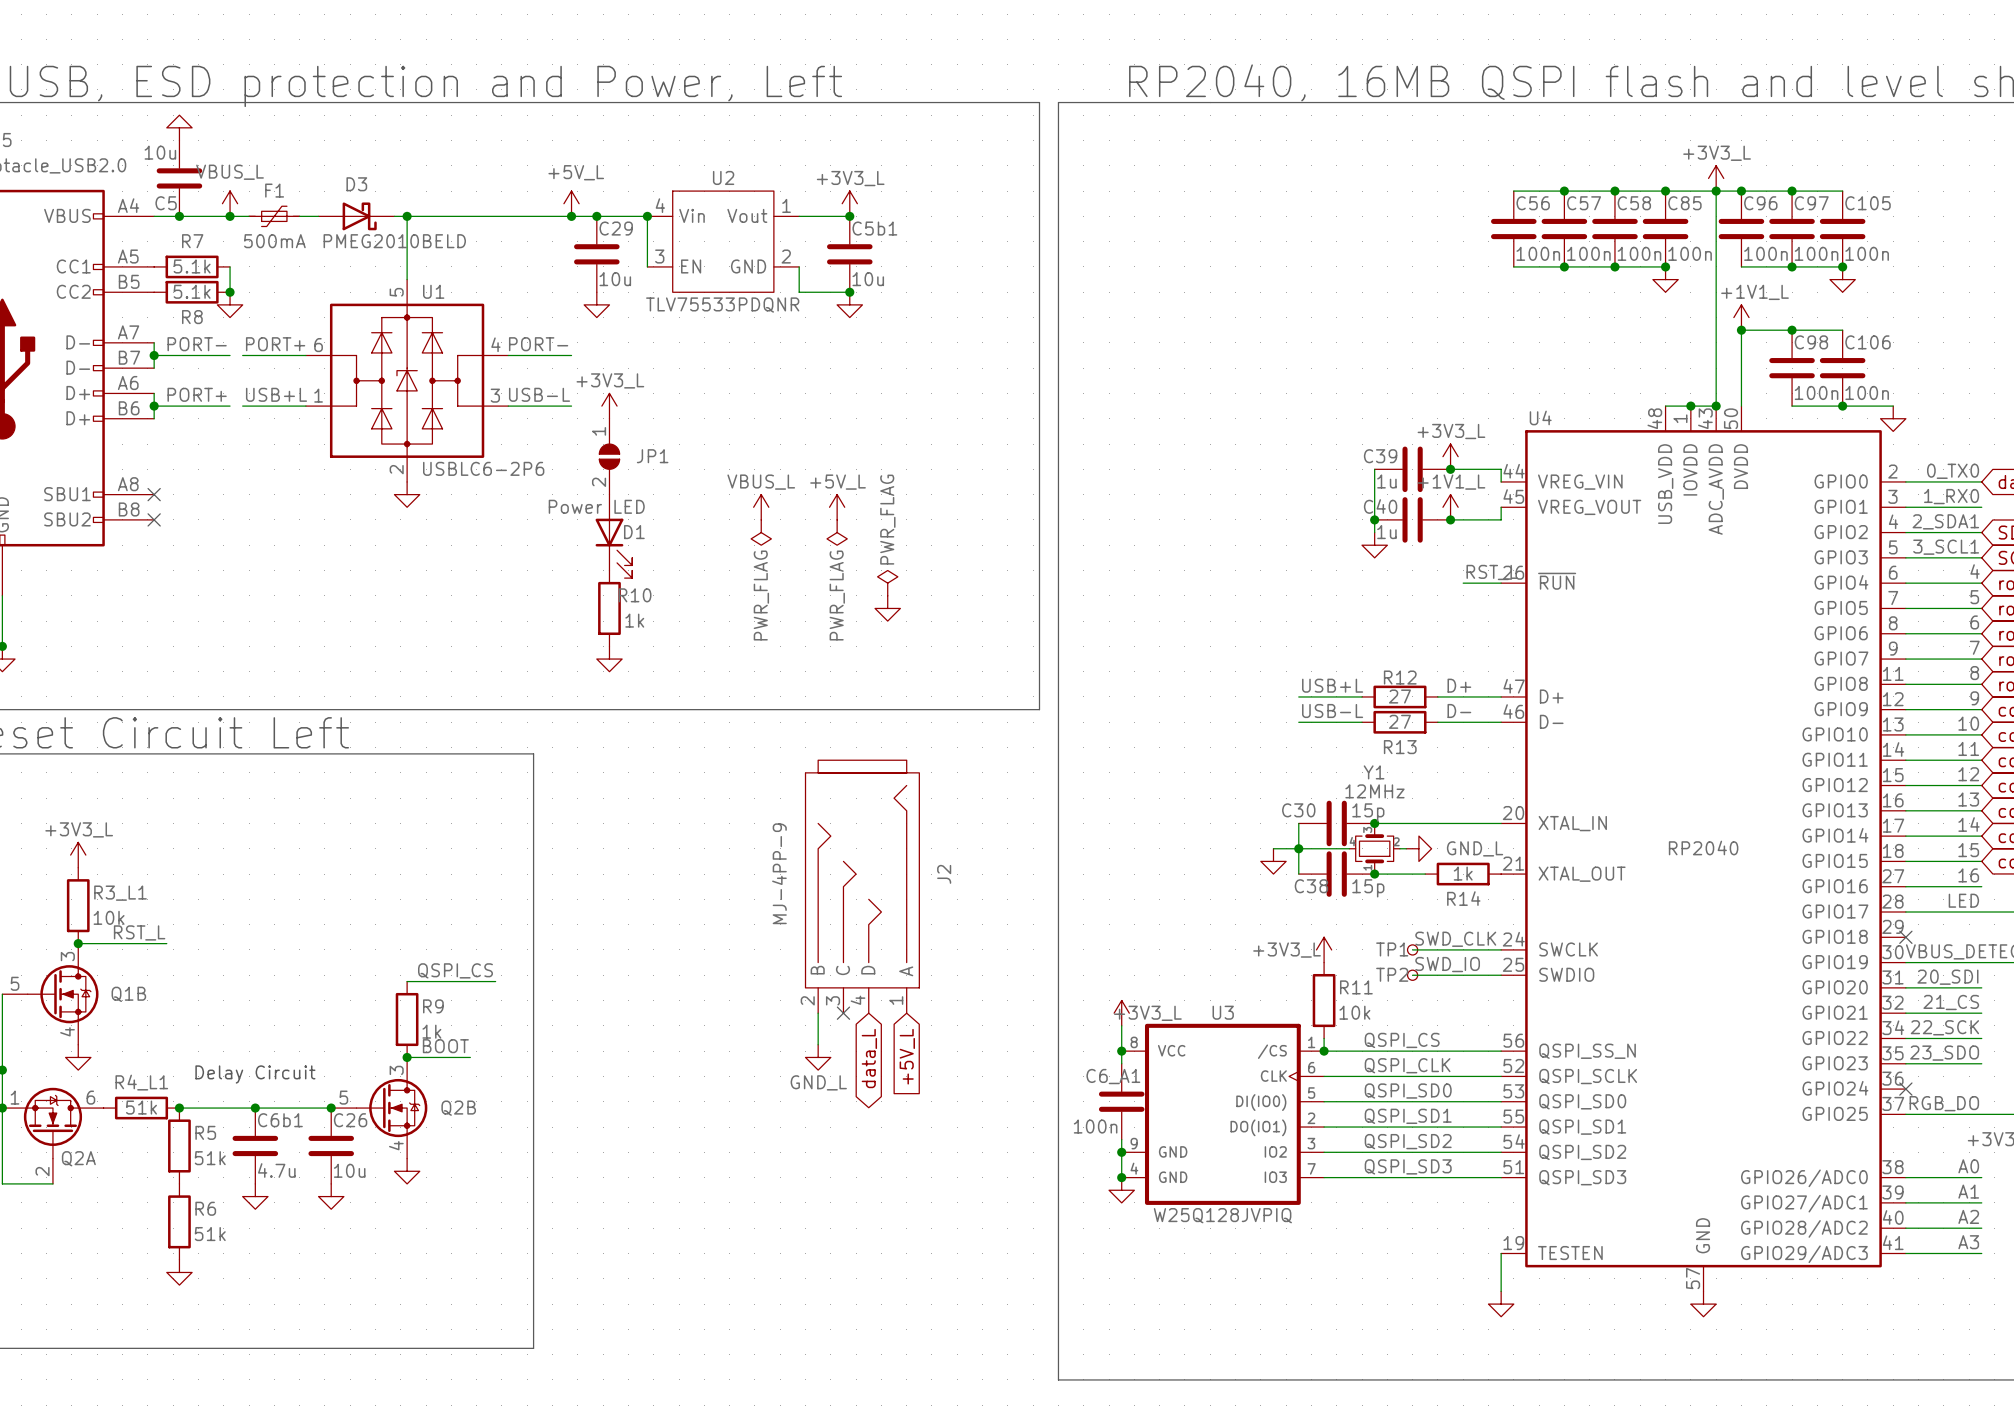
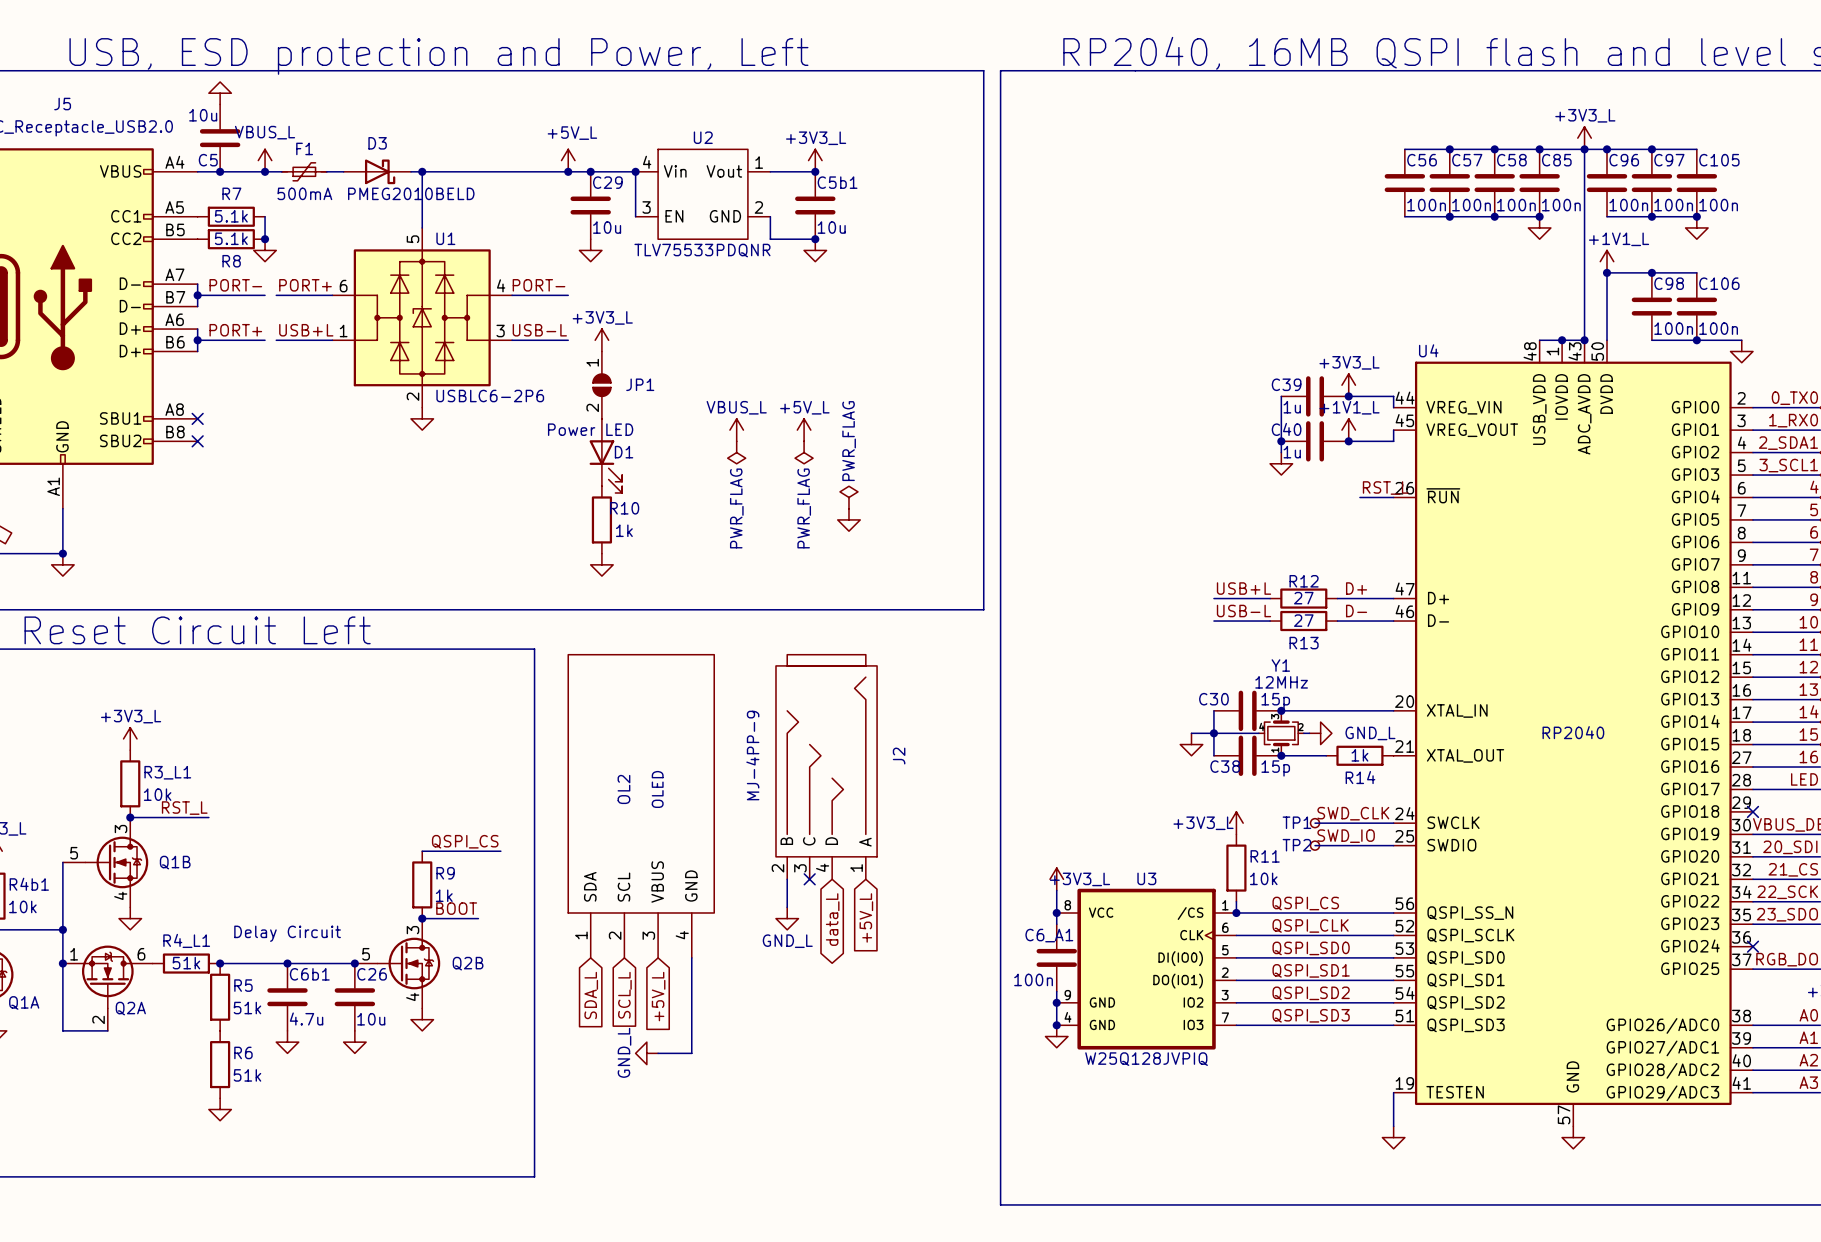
OL2: none -> OLED (641, 806)
wire: none -> (691, 957) (691, 1053) (658, 1053)
global label: none -> SCL_L (624, 995)
global label: none -> SDA_L (591, 995)
global label: none -> +5V_L (658, 996)
power symbol: none -> GND_L (646, 1053)

